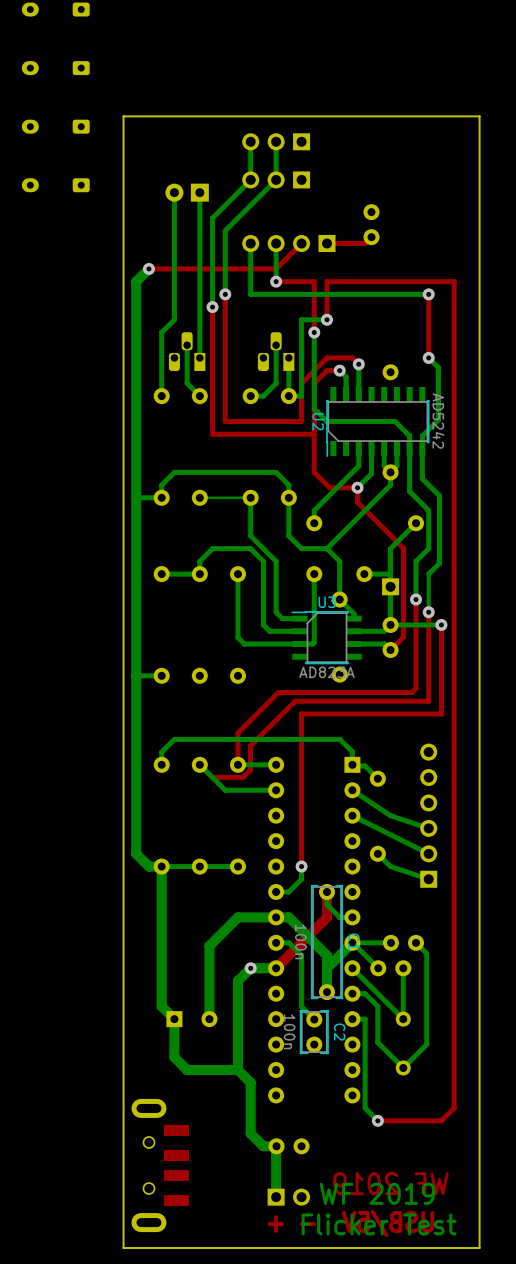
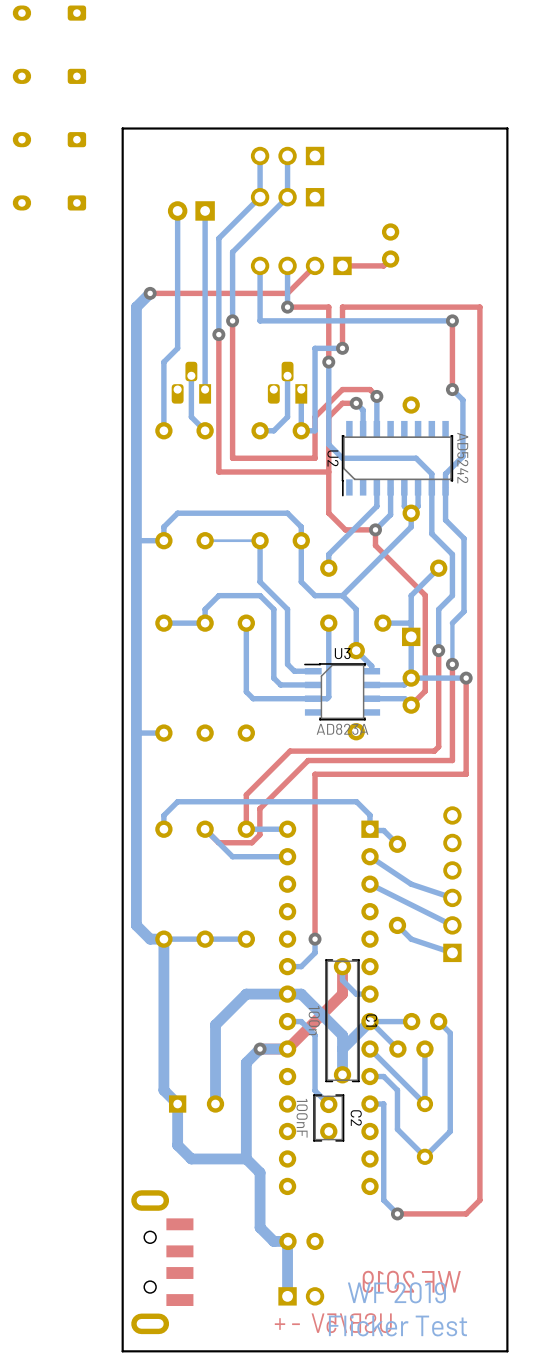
C2 value: 100n (289, 1031) -> 100nF (302, 1118)

